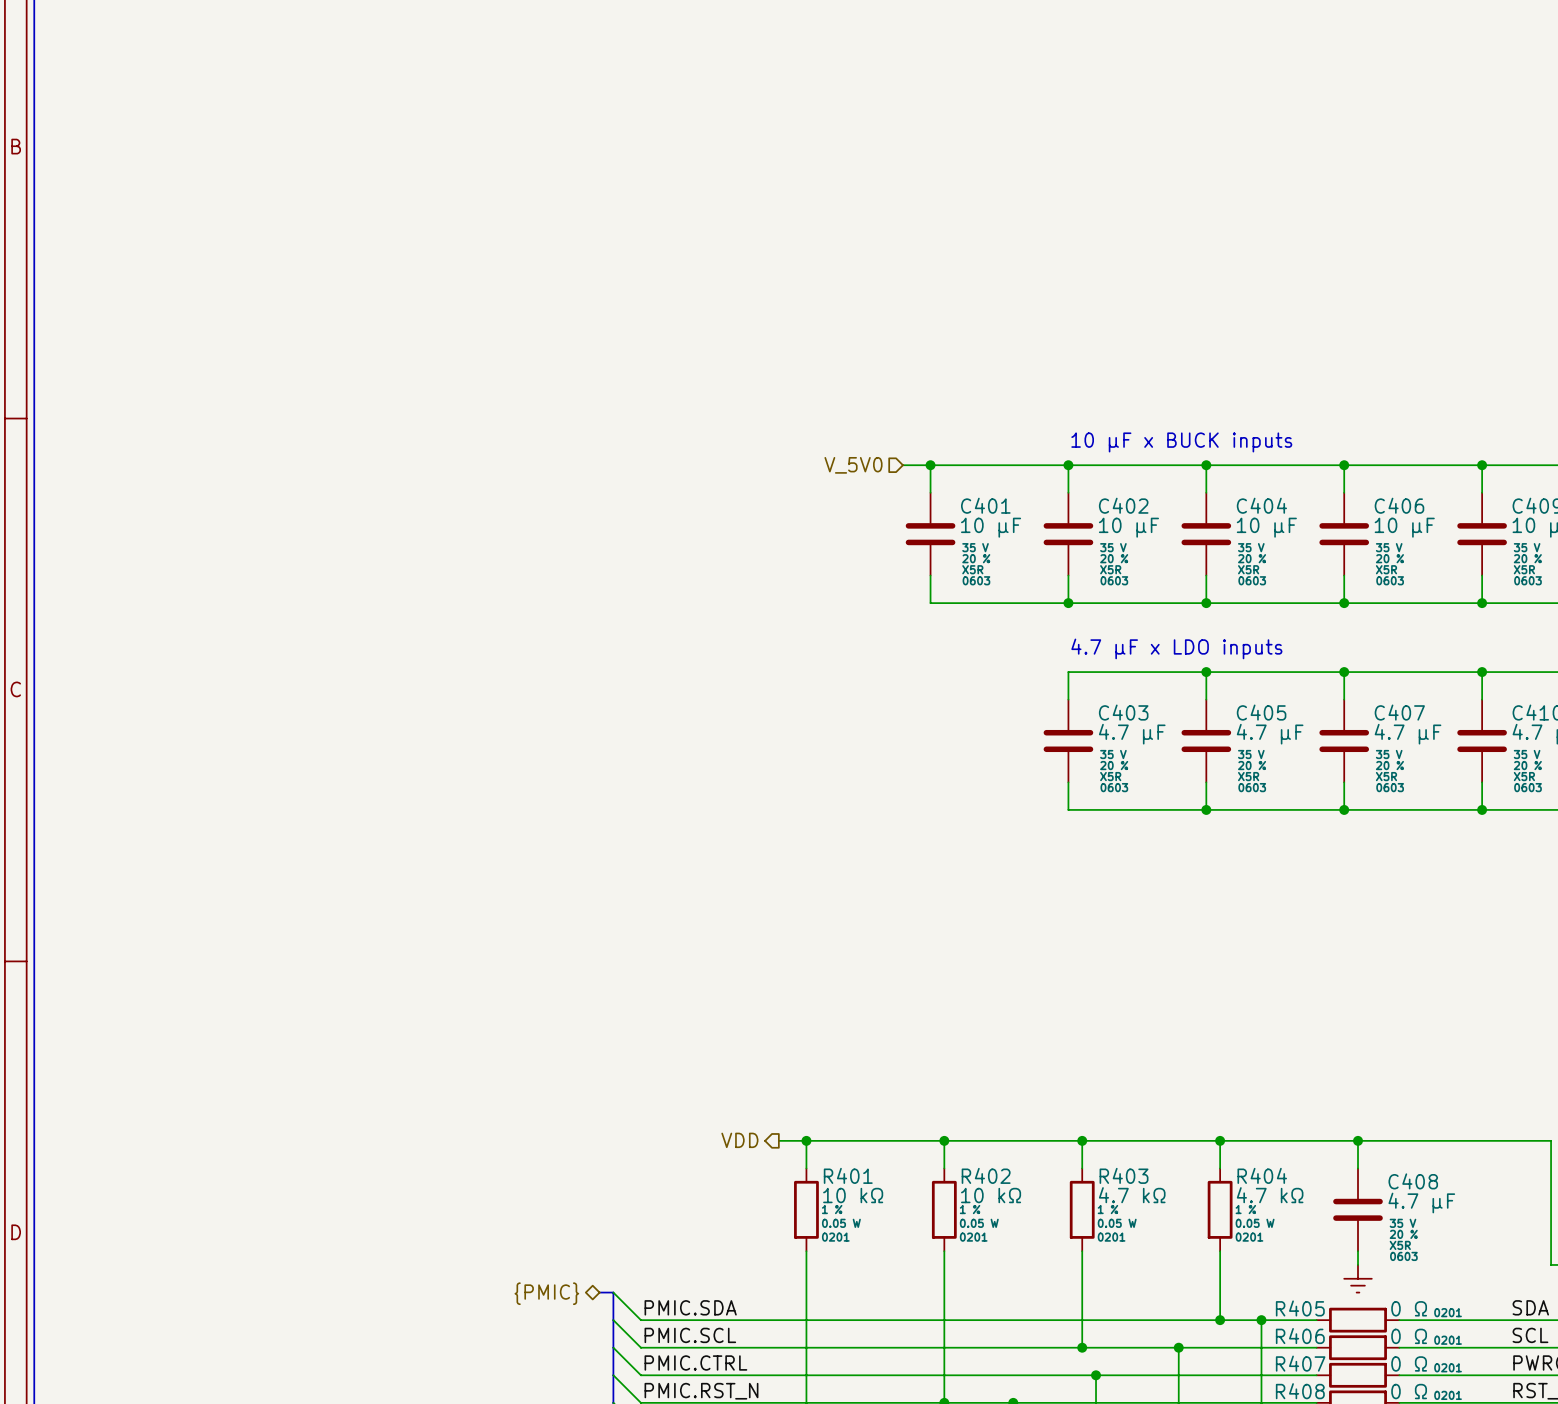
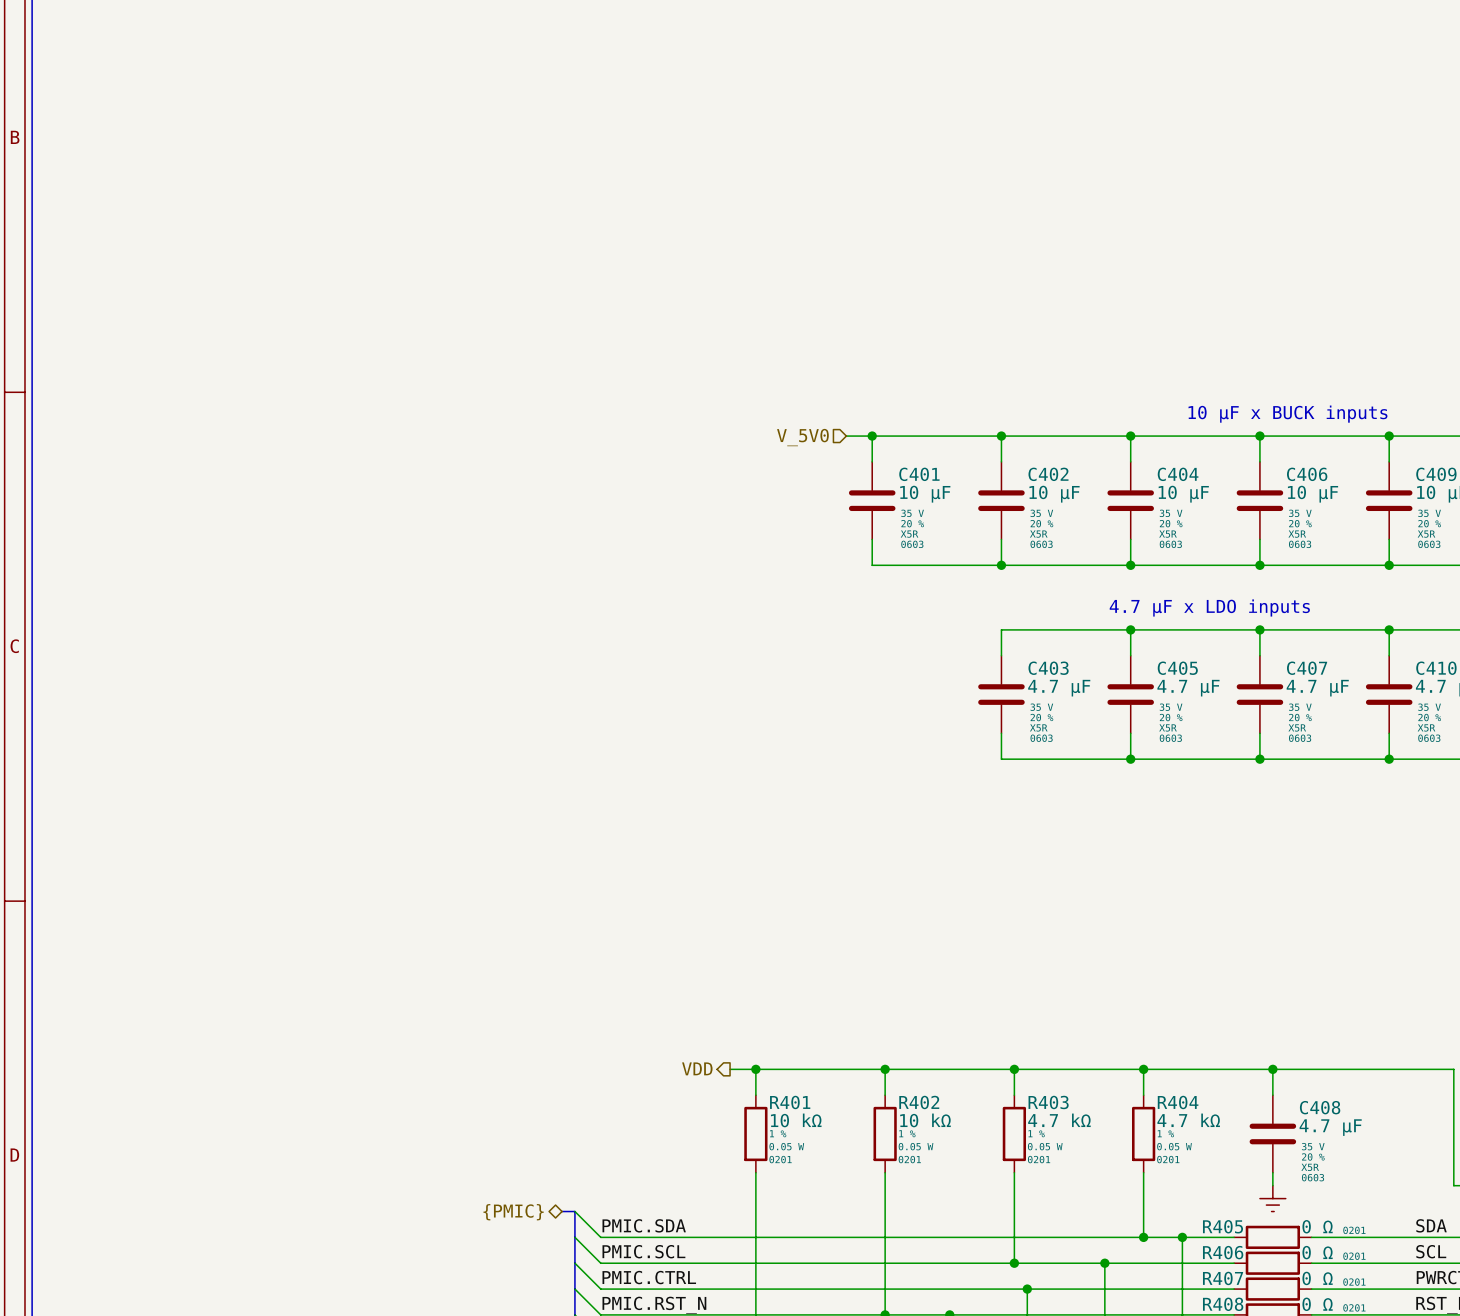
text: 10 µF x BUCK inputs (1181, 442) -> none
text: none -> 10 µF x BUCK inputs (1287, 414)
text: 4.7 µF x LDO inputs (1176, 648) -> none
text: none -> 4.7 µF x LDO inputs (1209, 607)

